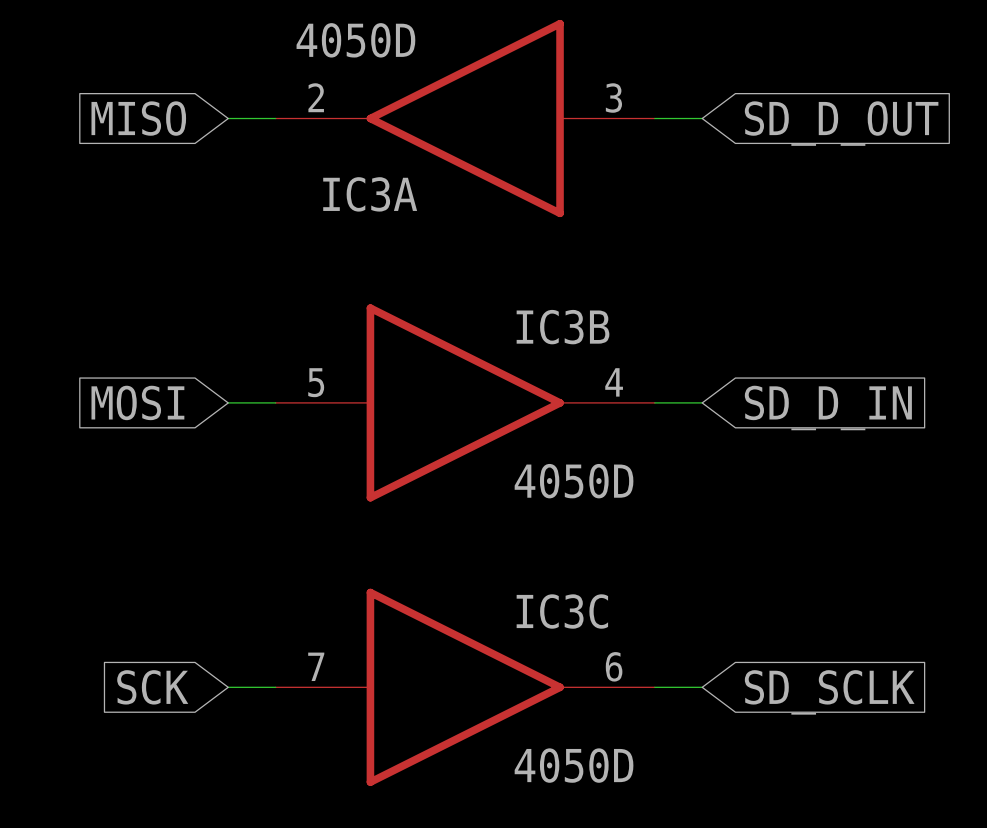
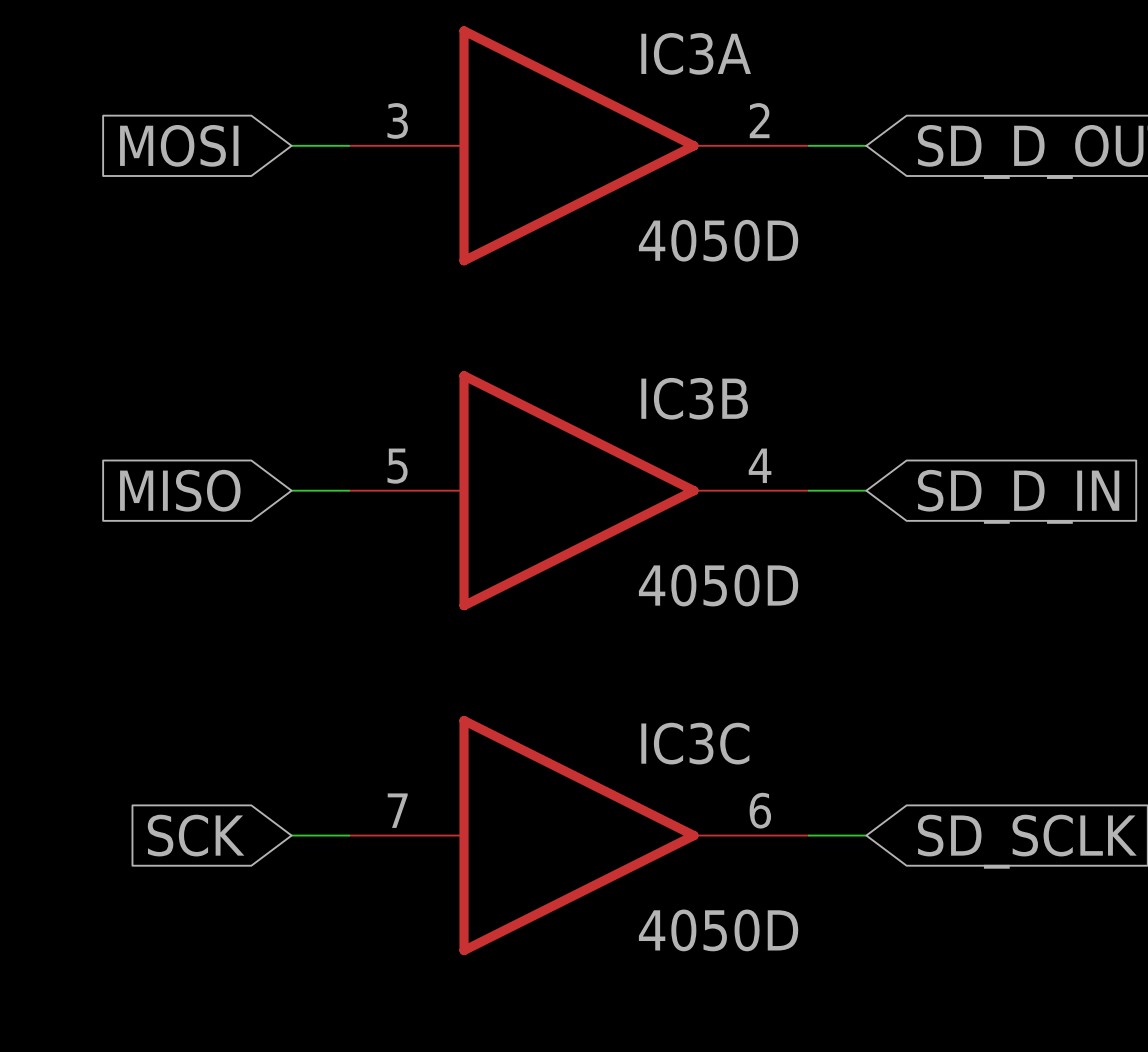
global label: MISO (138, 118) -> MOSI (179, 145)
IC3A rotation: 0° (465, 118) -> 180° (578, 145)
global label: MOSI (137, 402) -> MISO (180, 490)

